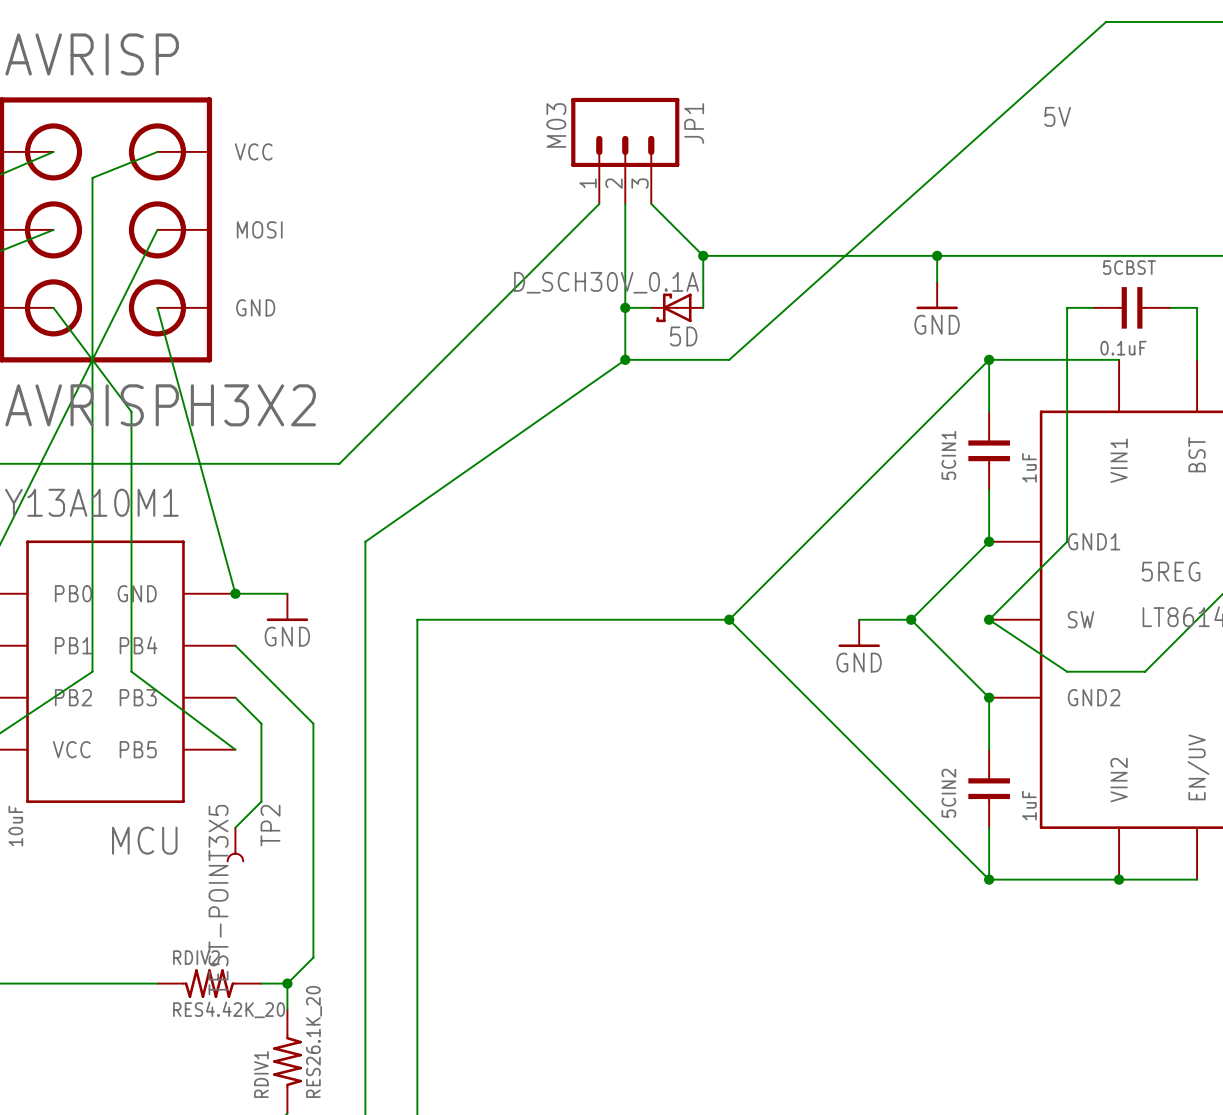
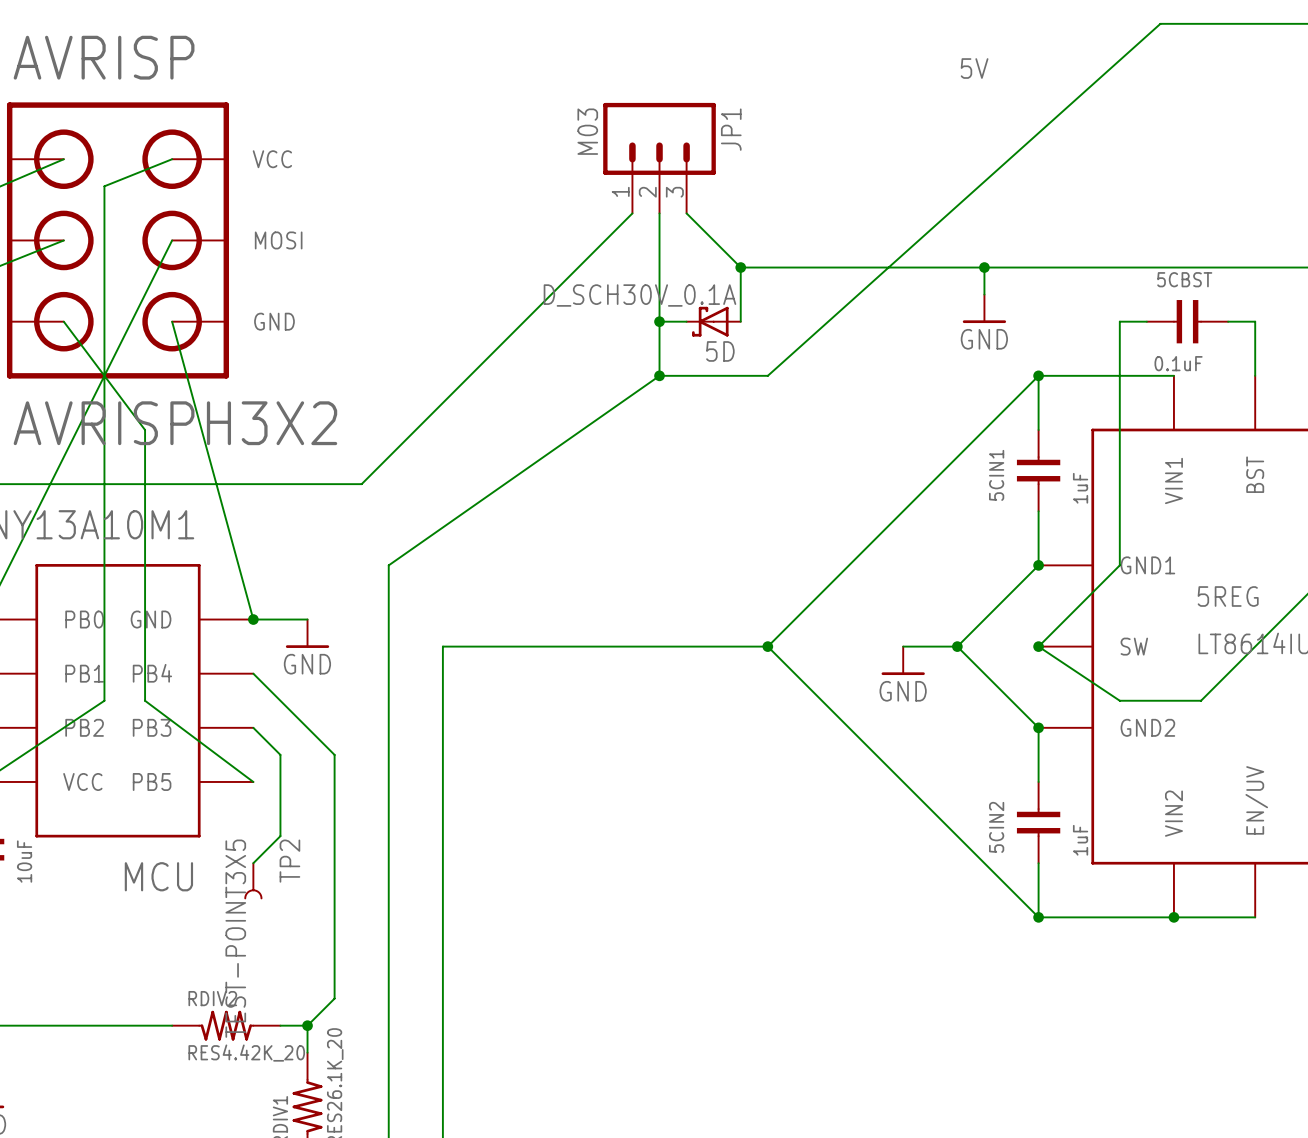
label position: 5V (1057, 116) -> 5V (974, 68)

